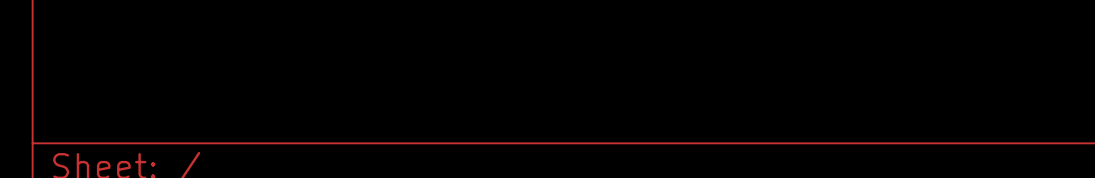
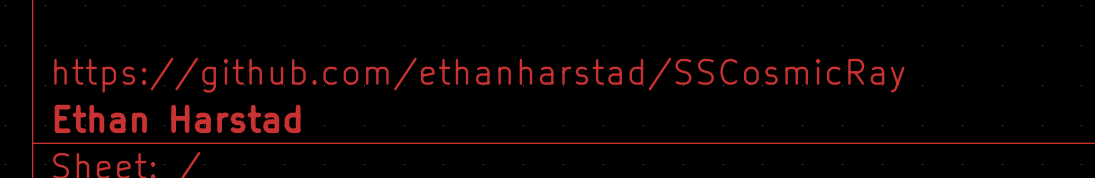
title block: none -> https://github.com/ethanharstad/SSCosmicRay (479, 75)
title block: none -> Ethan Harstad (177, 118)

